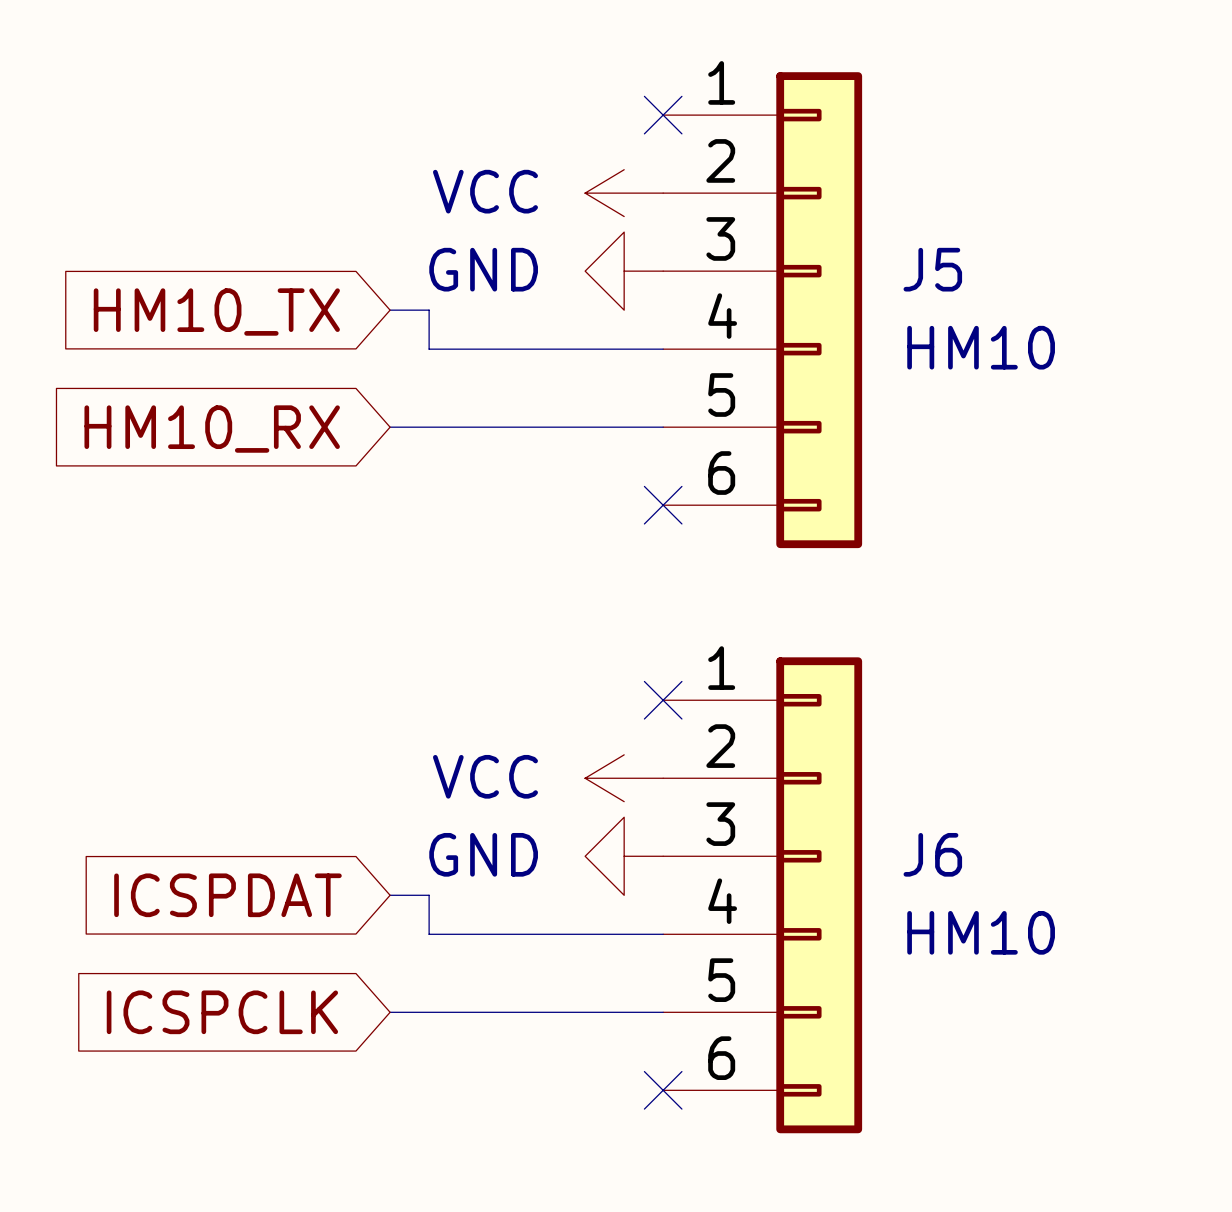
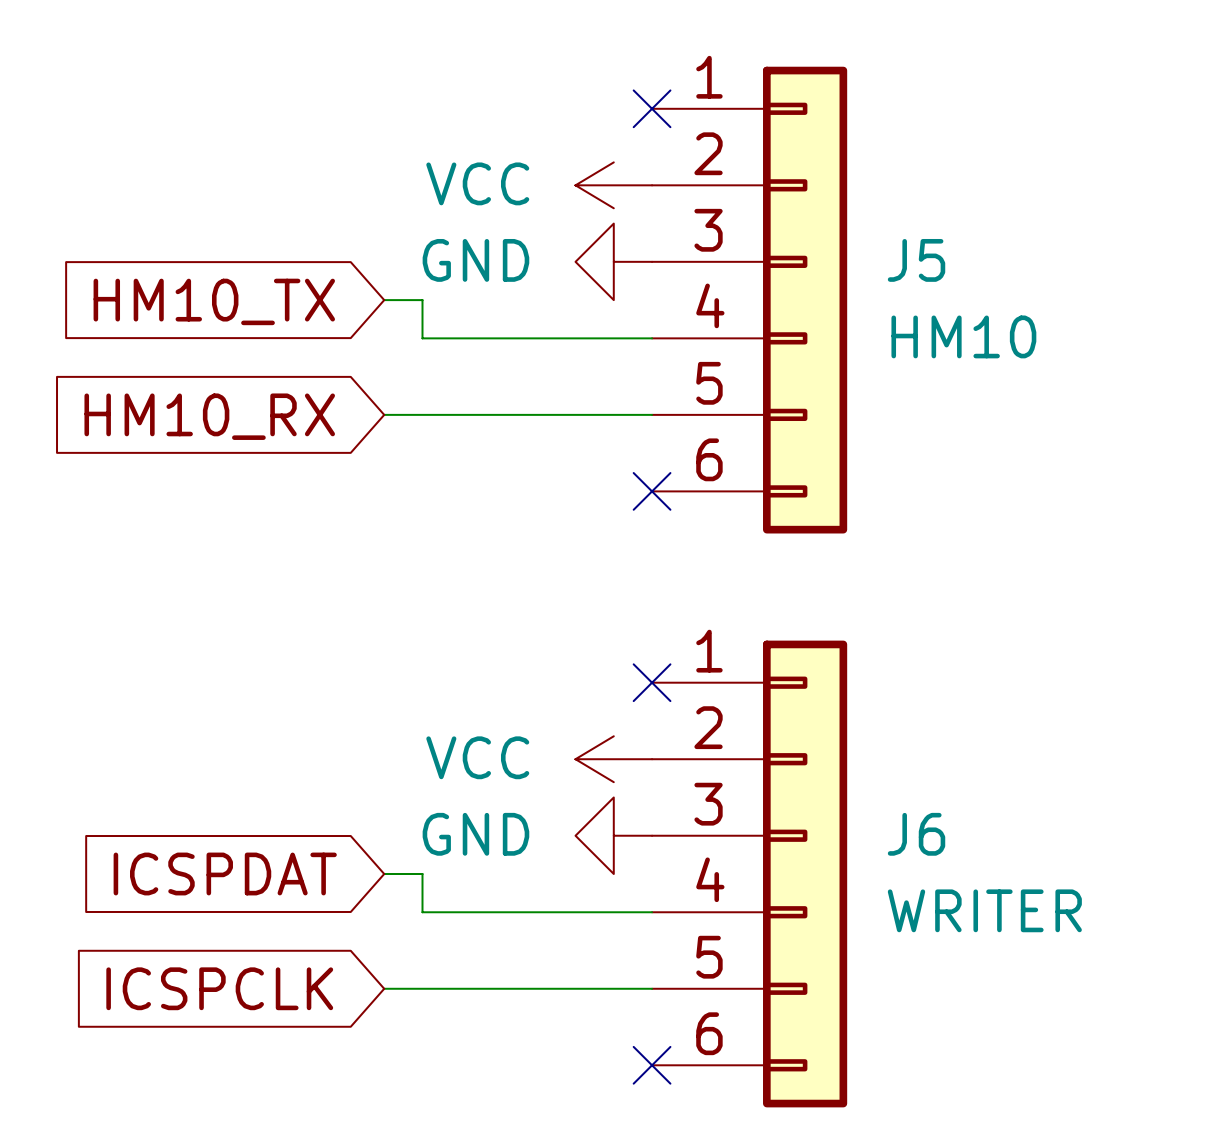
J6 value: HM10 (981, 932) -> WRITER (984, 910)

